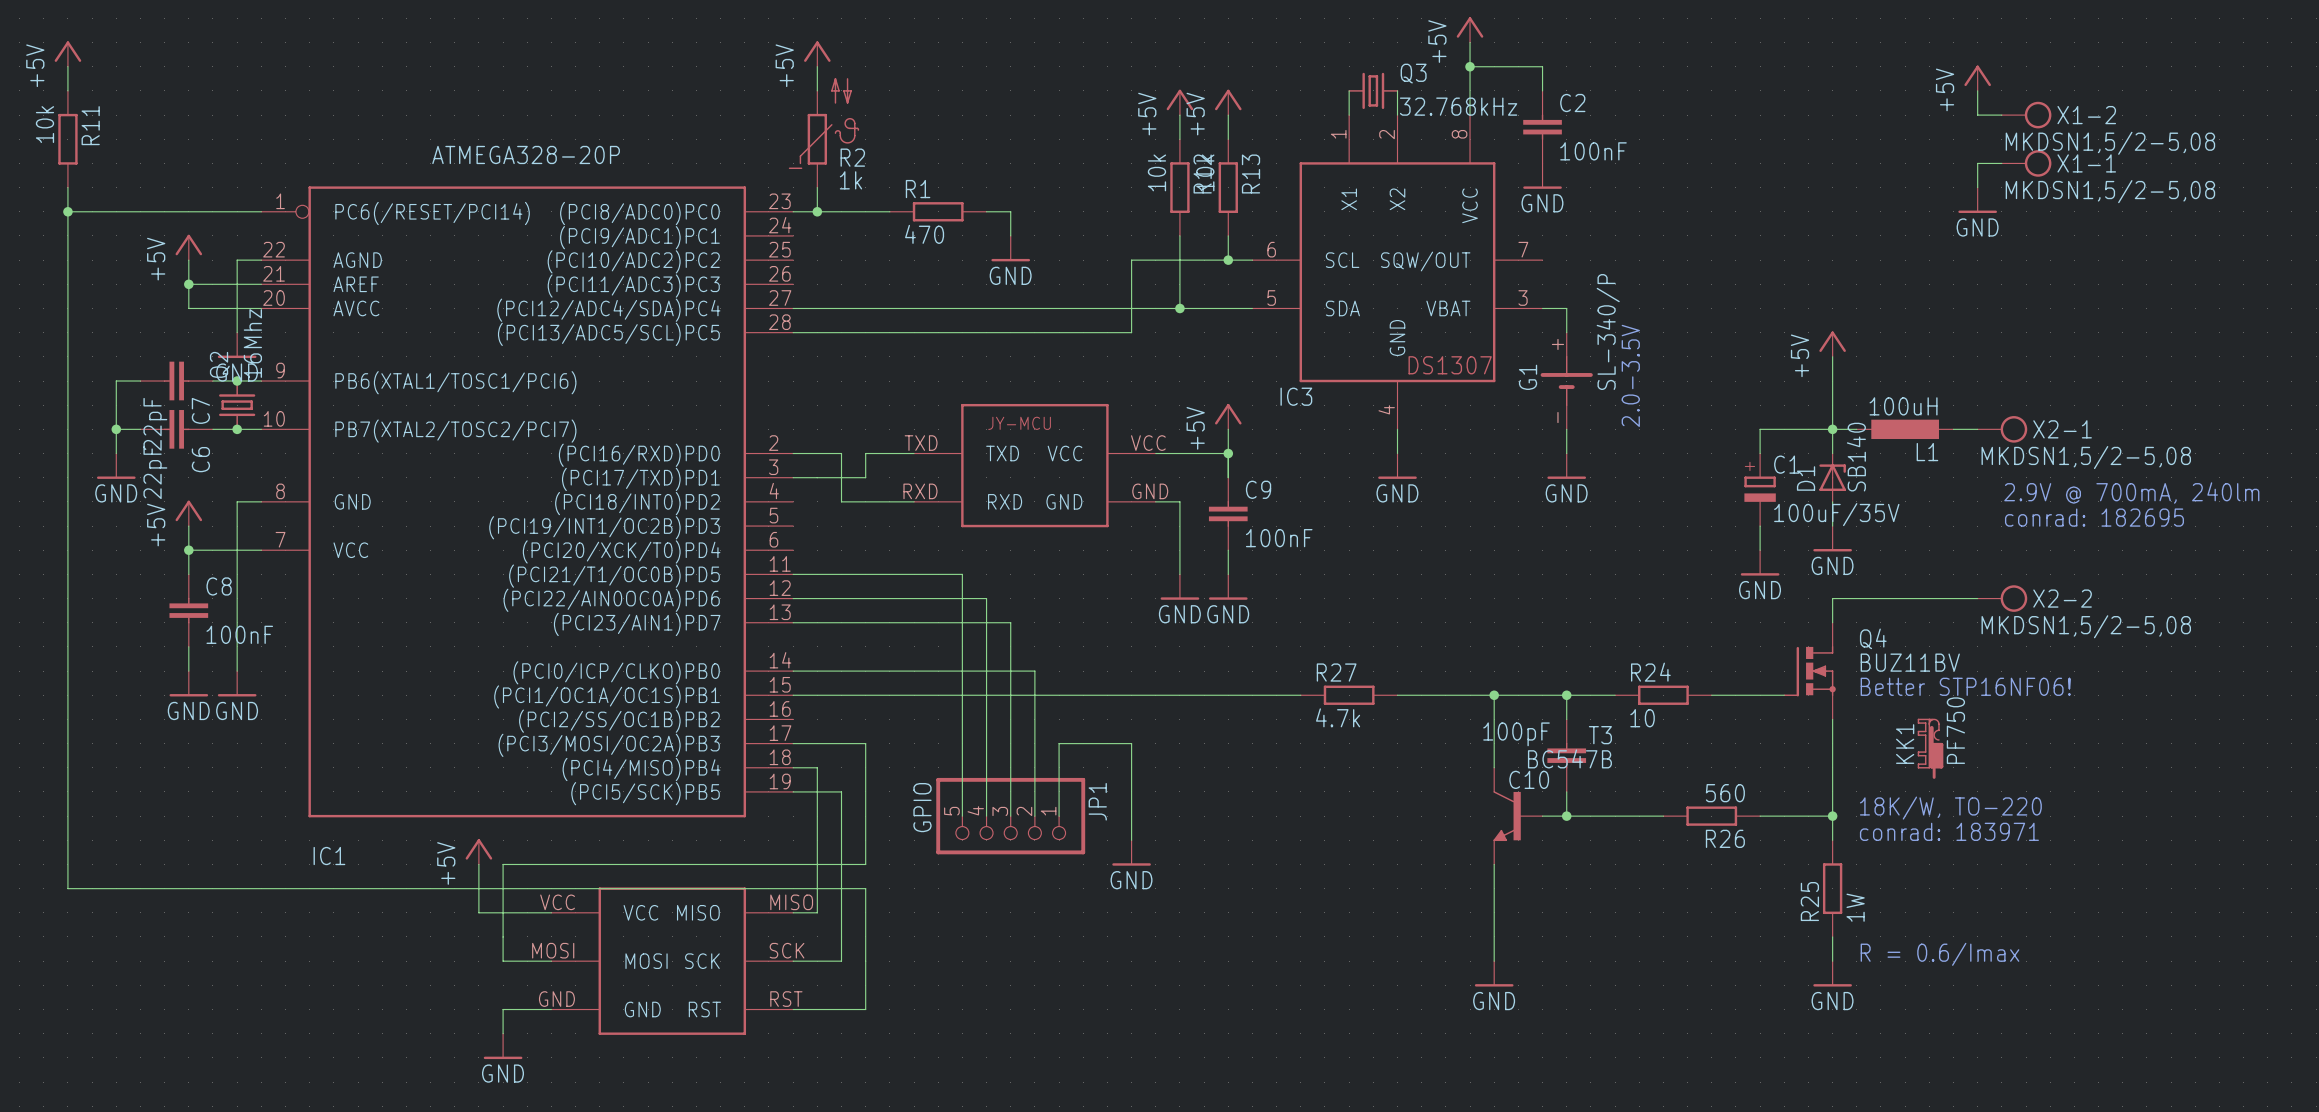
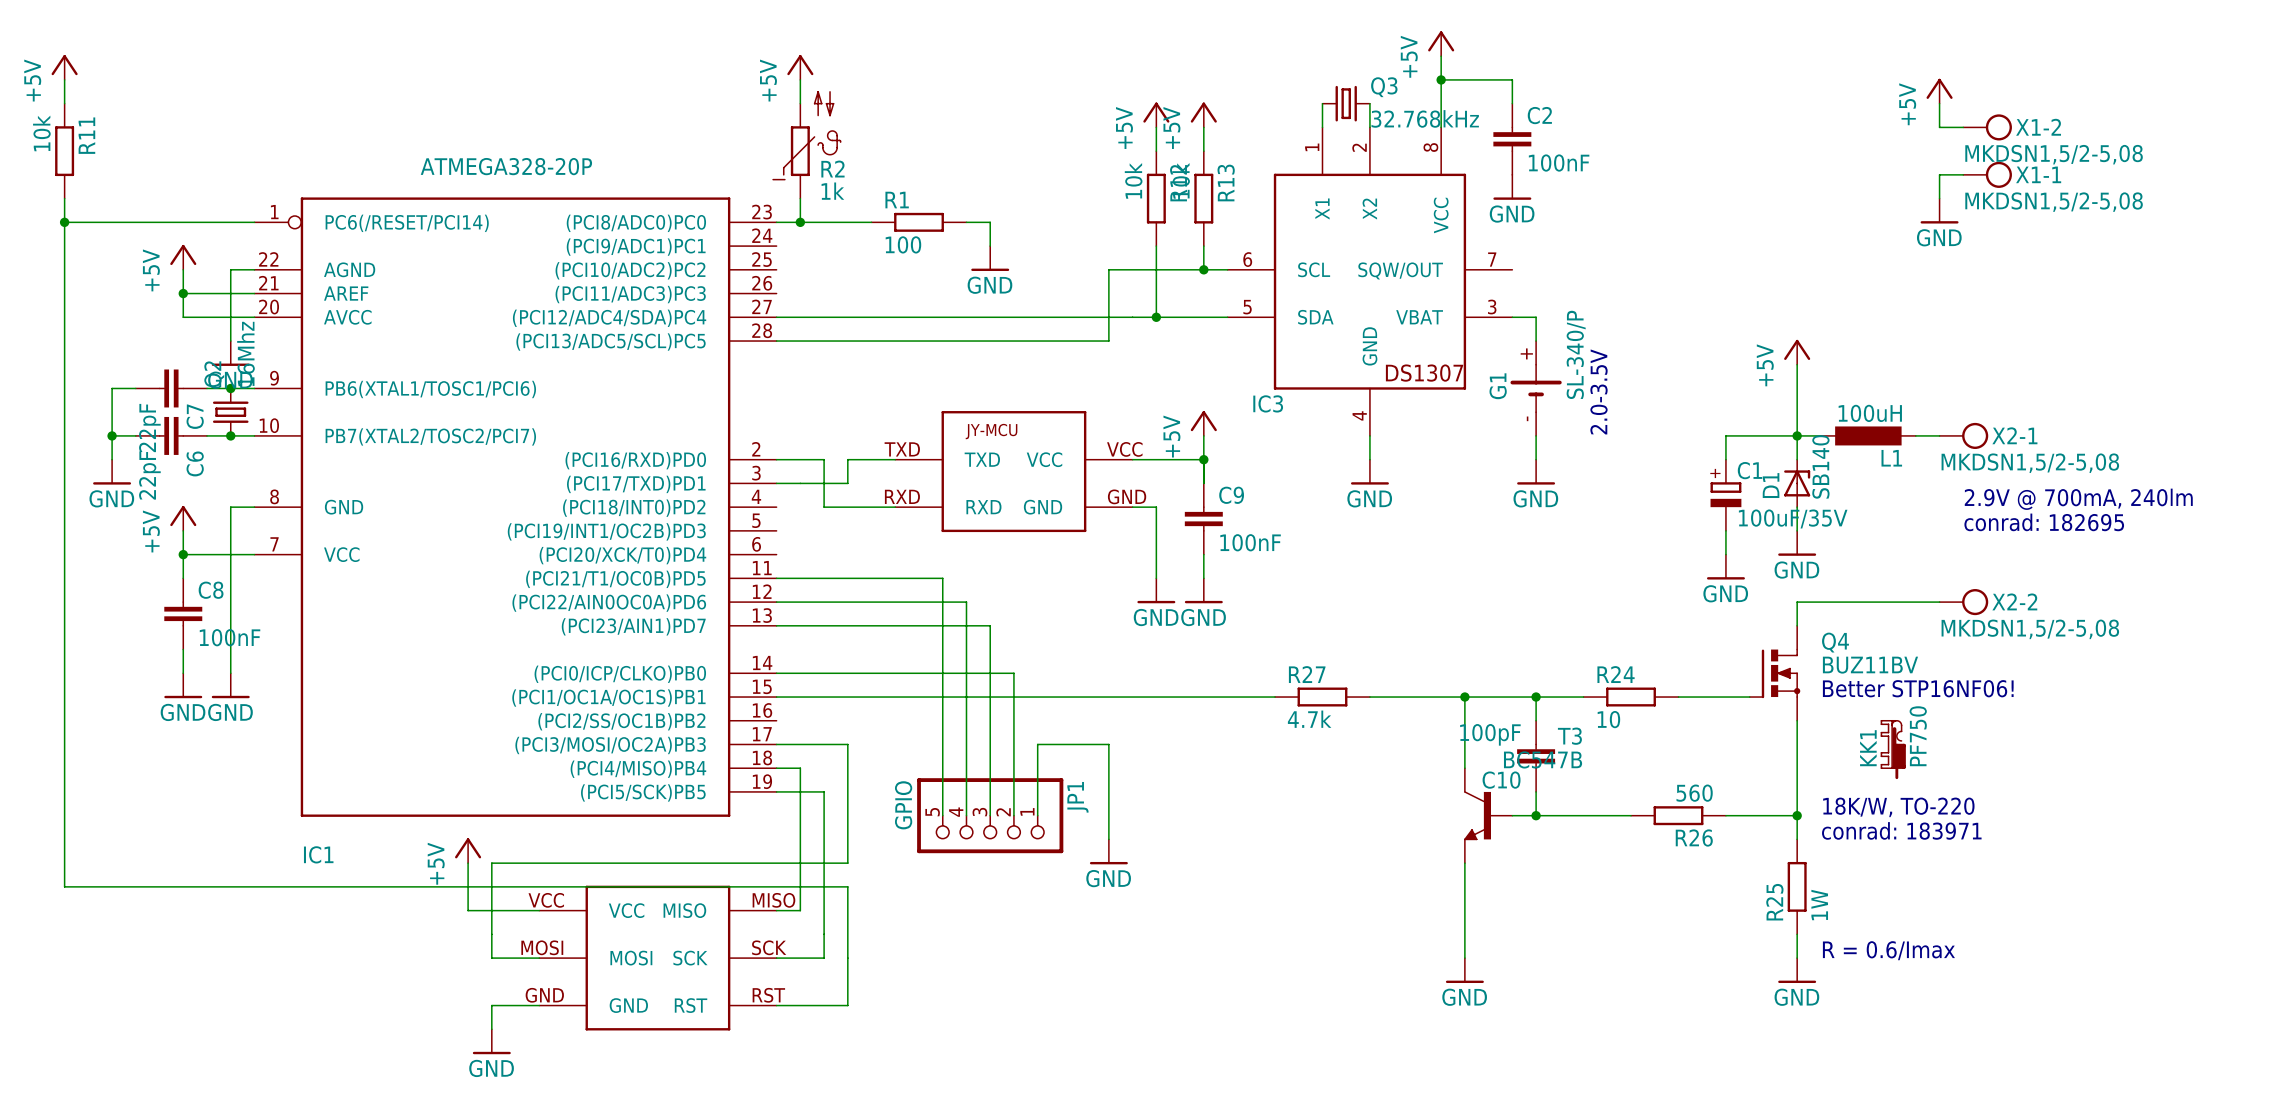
R1 value: 470 (924, 234) -> 100 (903, 244)

